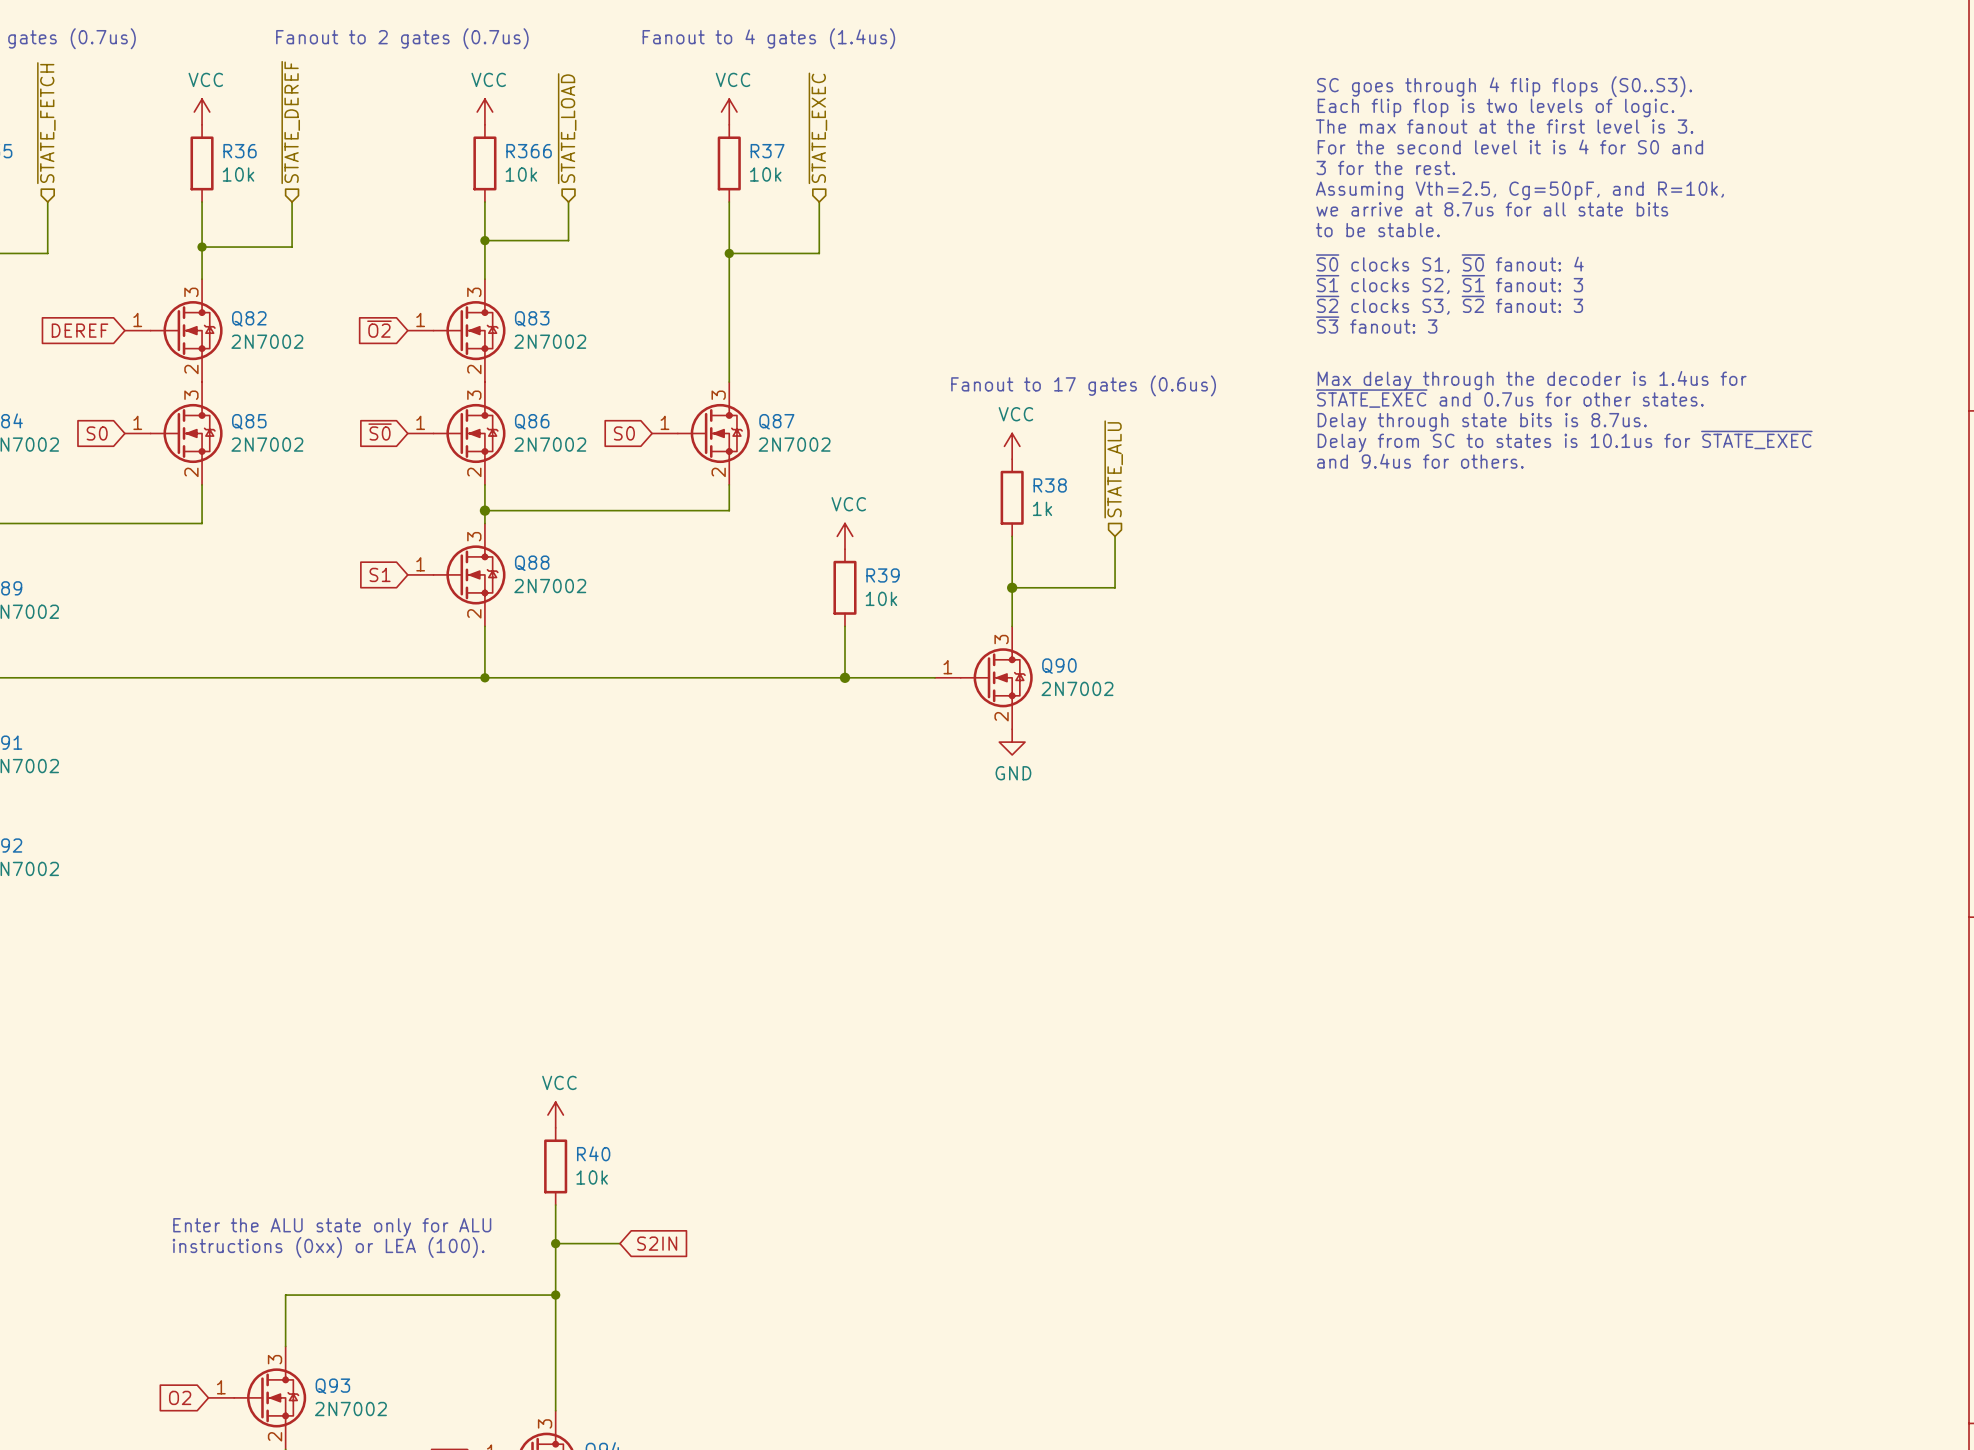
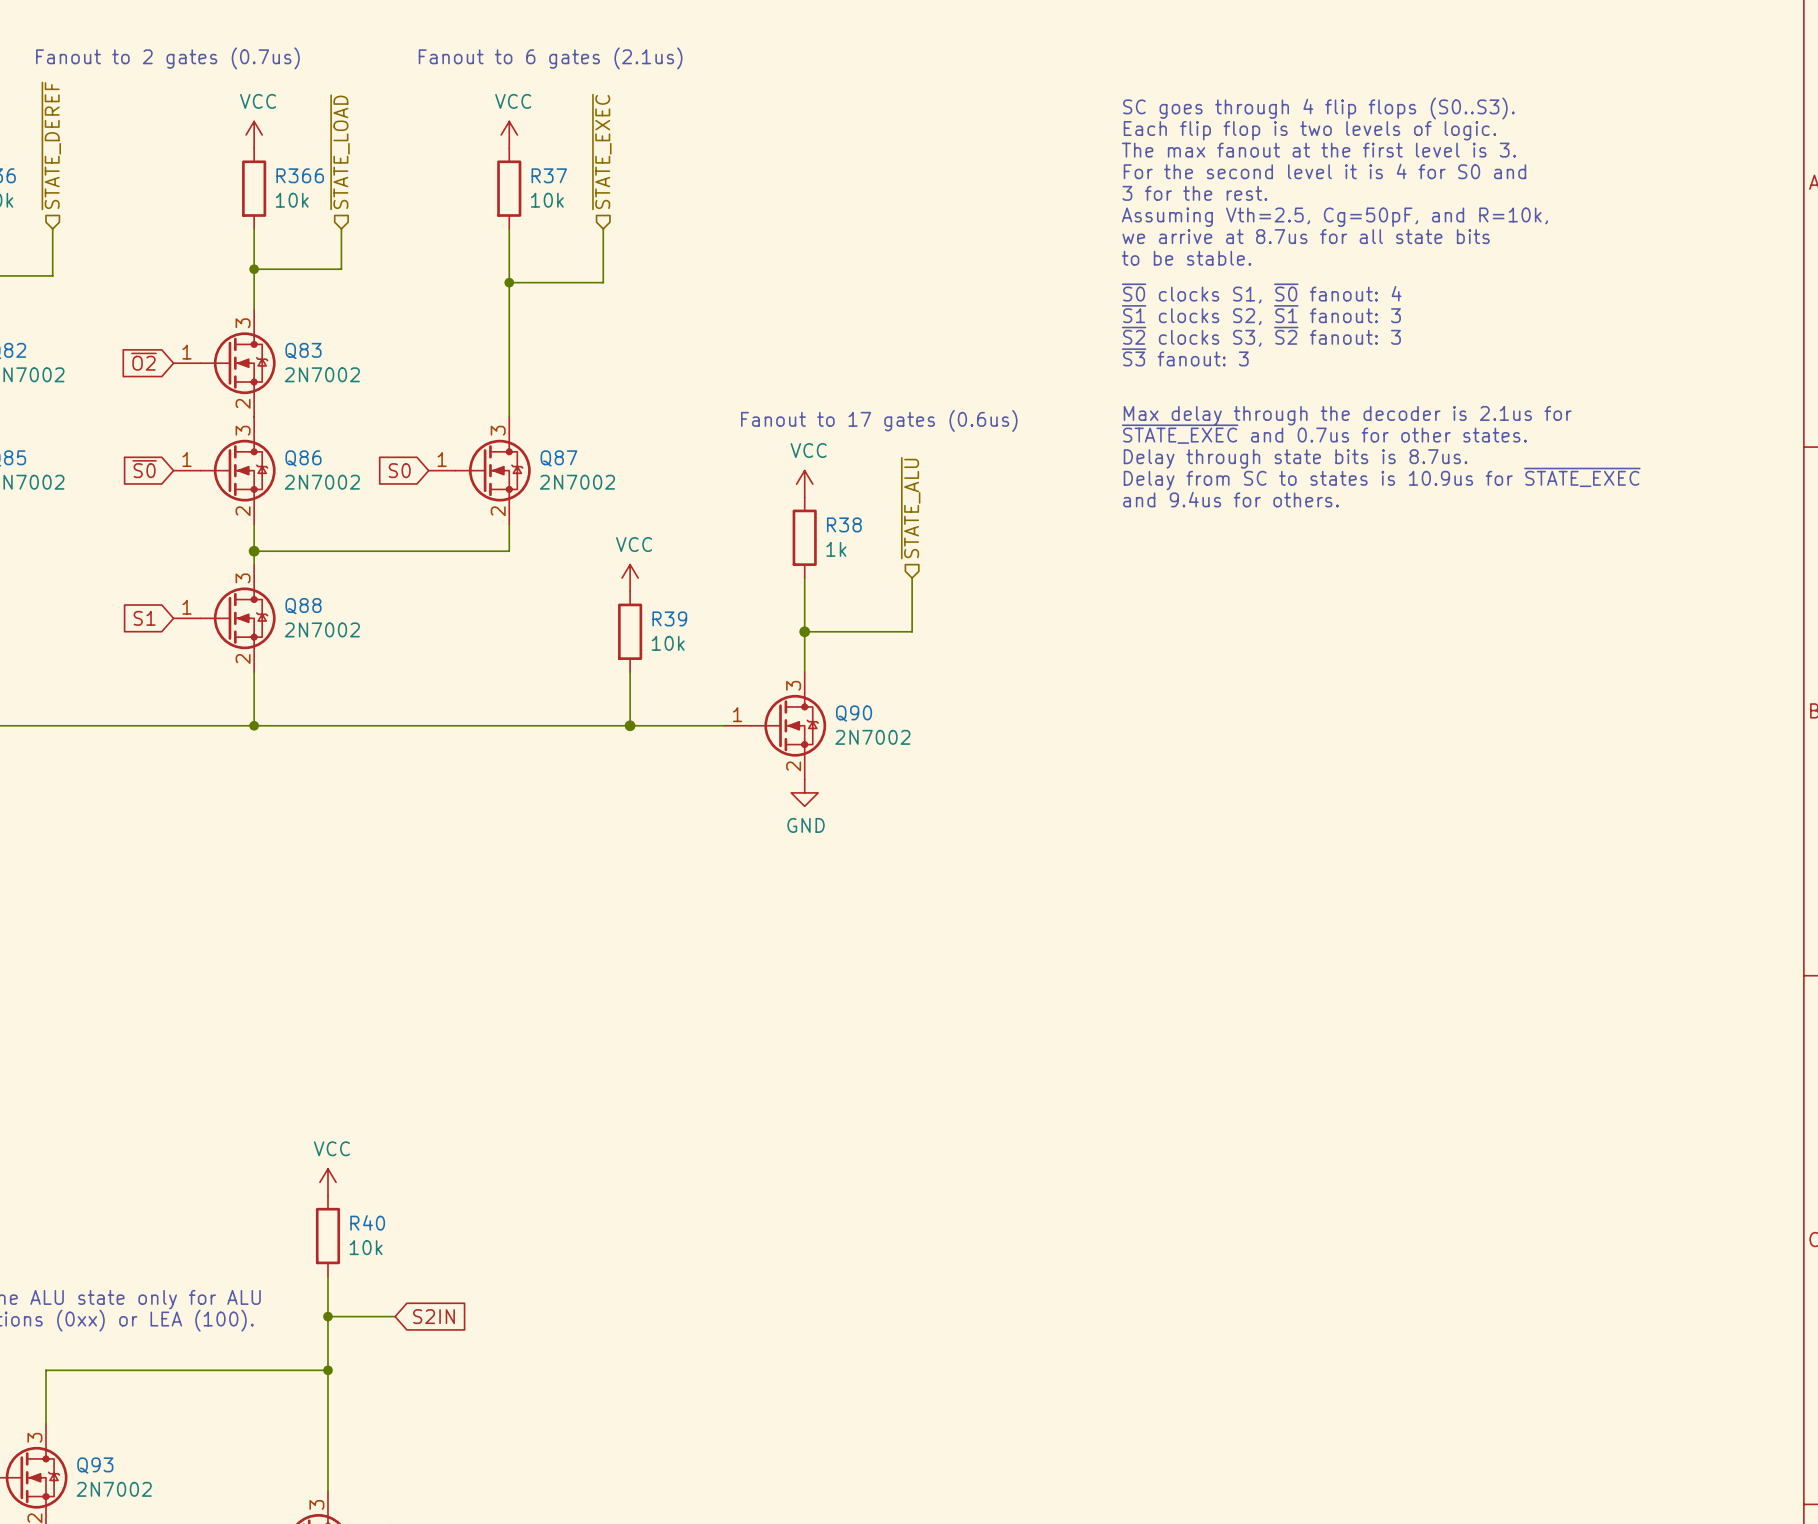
text: Fanout to 4 gates (1.4us) (768, 38) -> Fanout to 6 gates (2.1us) (550, 58)
text: Max delay through the decoder is 1.4us for (1532, 380) -> Max delay through the decoder is 2.1us for (1347, 415)
text: Delay from SC to states is 10.1us for ~{STATE_EXEC} (1565, 441) -> Delay from SC to states is 10.9us for ~{STATE_EXEC} (1382, 479)

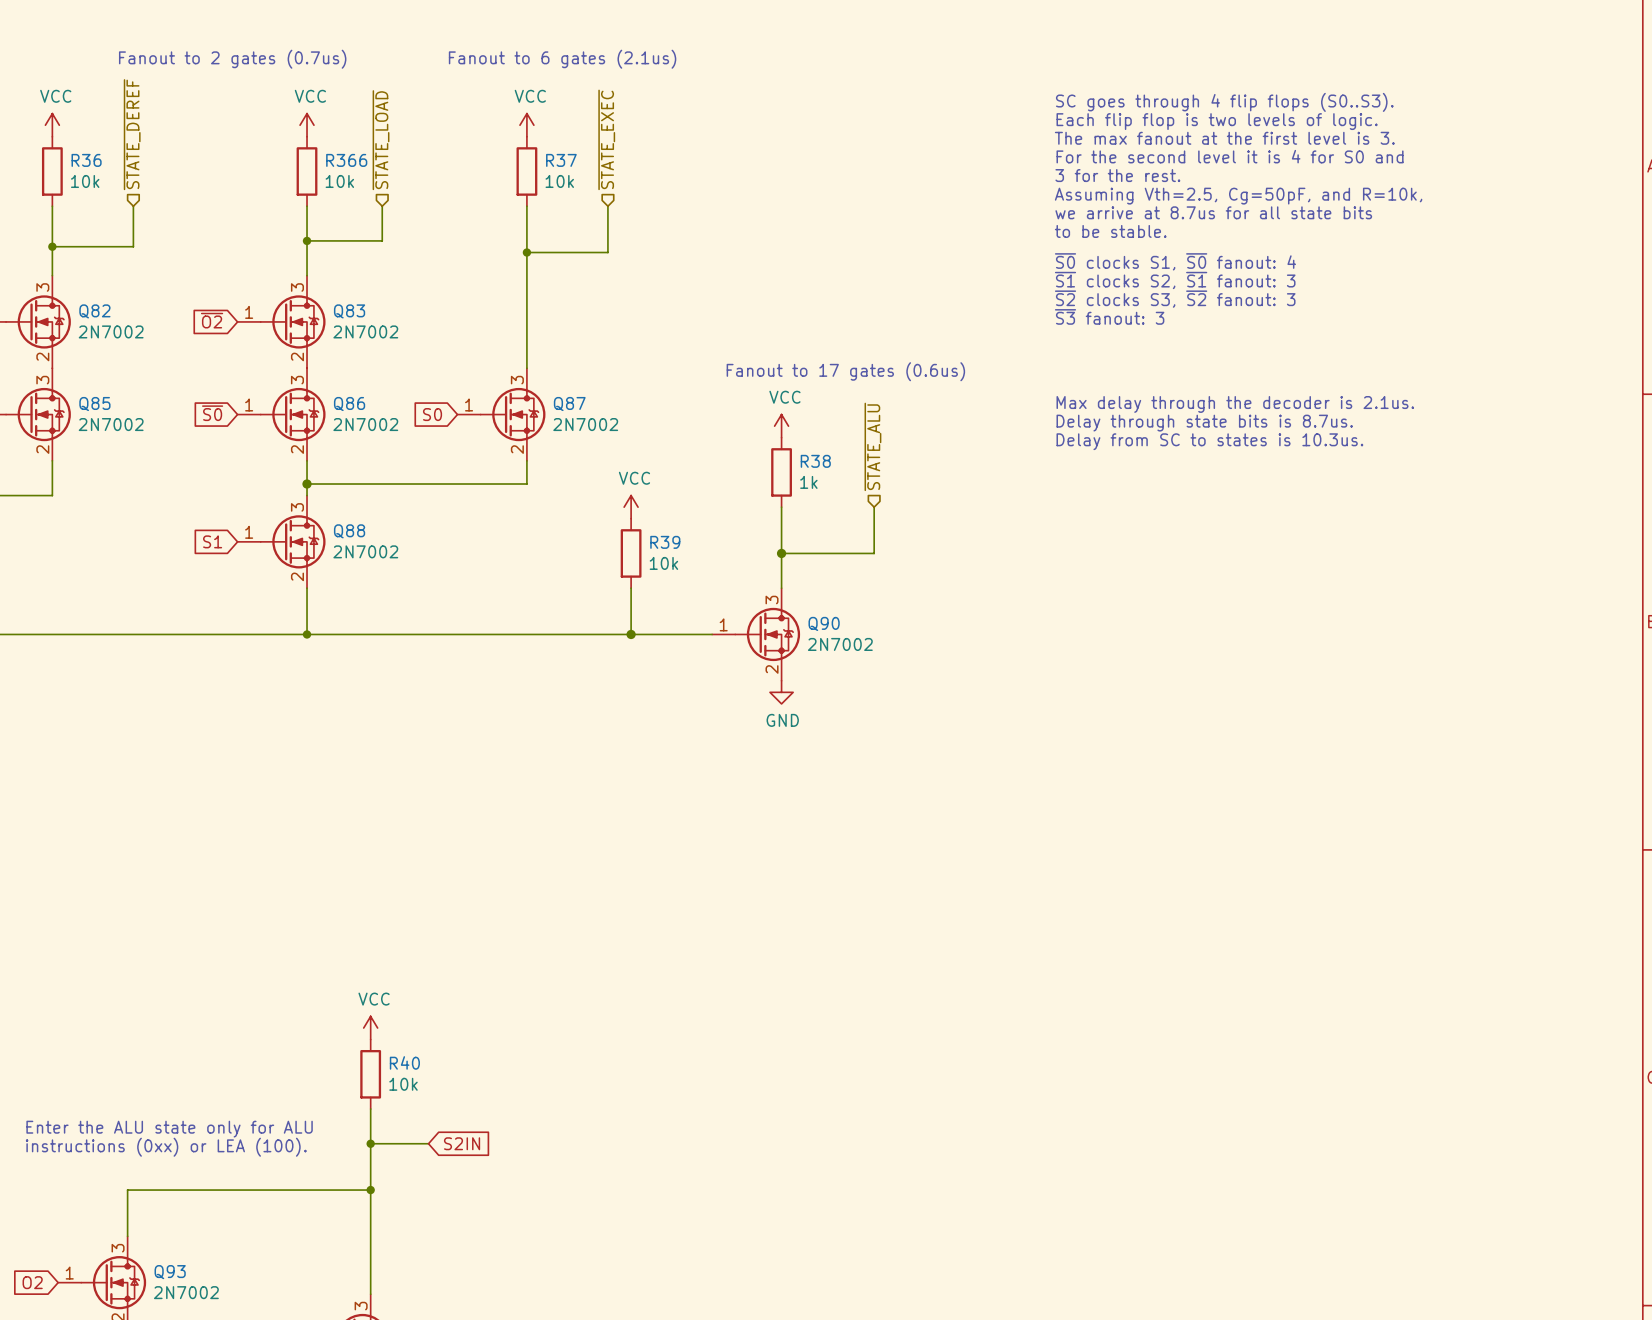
text: Max delay through the decoder is 2.1us for (1347, 415) -> none
text: ~{STATE_EXEC} and 0.7us for other states. (1324, 434) -> none
text: Delay through state bits is 8.7us. (1295, 458) -> Max delay through the decoder is 2.1us. (1235, 404)
text: Delay from SC to states is 10.9us for ~{STATE_EXEC} (1382, 479) -> Delay through state bits is 8.7us. (1204, 423)
text: and 9.4us for others. (1230, 499) -> Delay from SC to states is 10.3us. (1209, 441)

